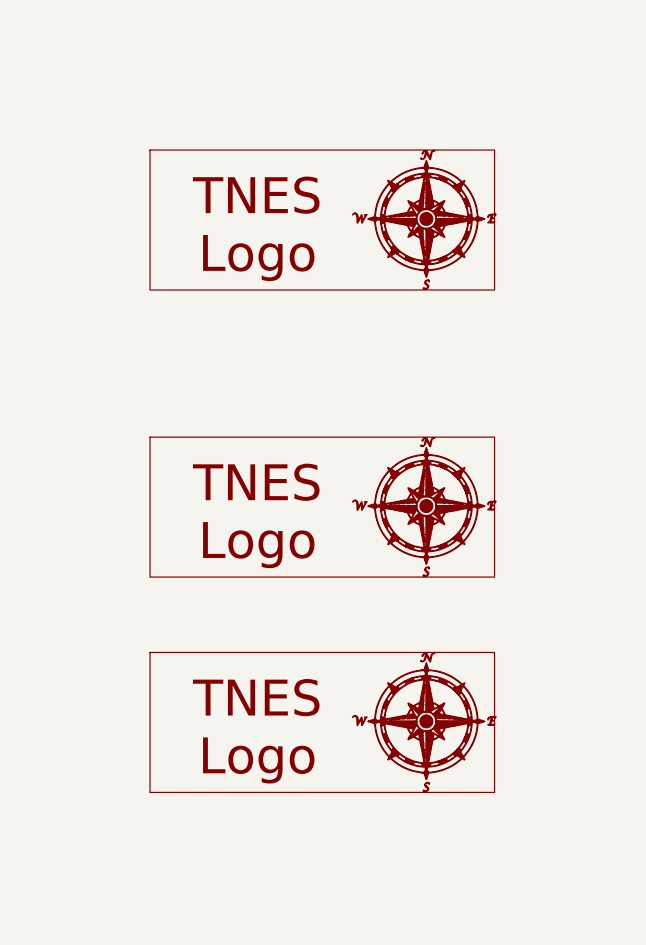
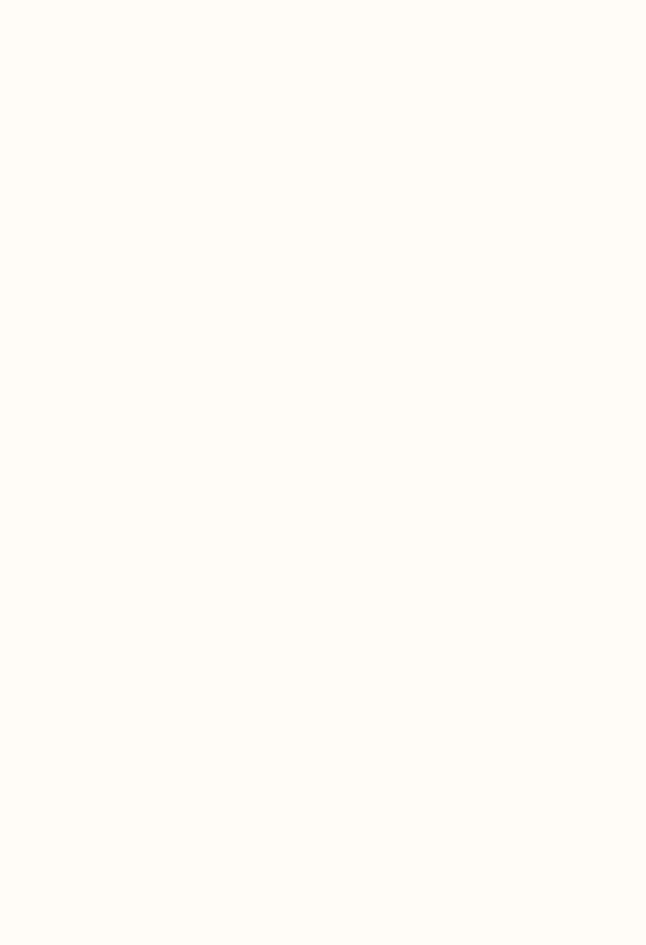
part: (323, 219) -> none
part: (323, 507) -> none
part: (323, 722) -> none

